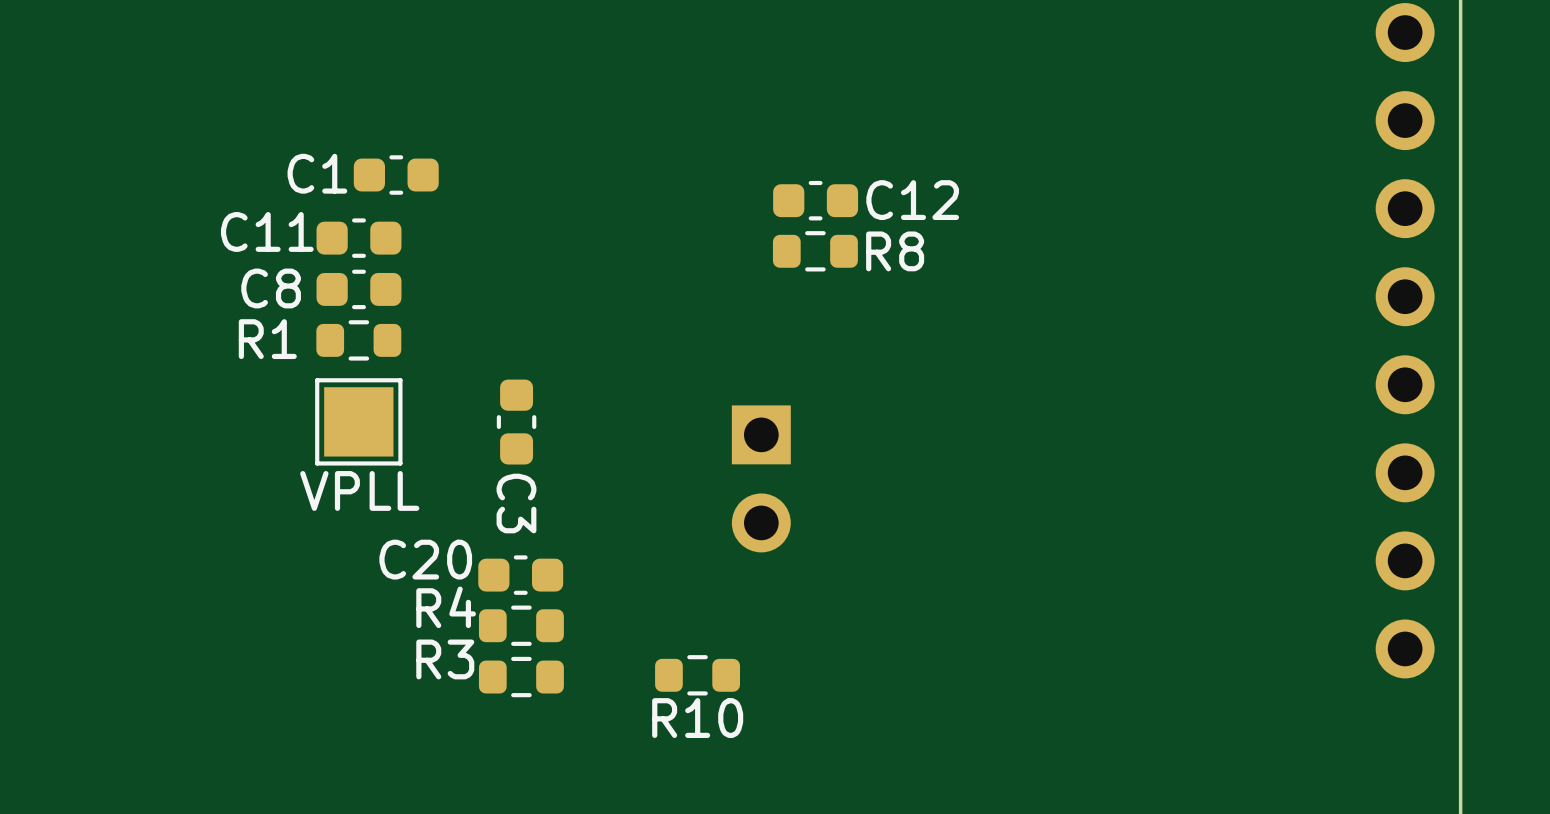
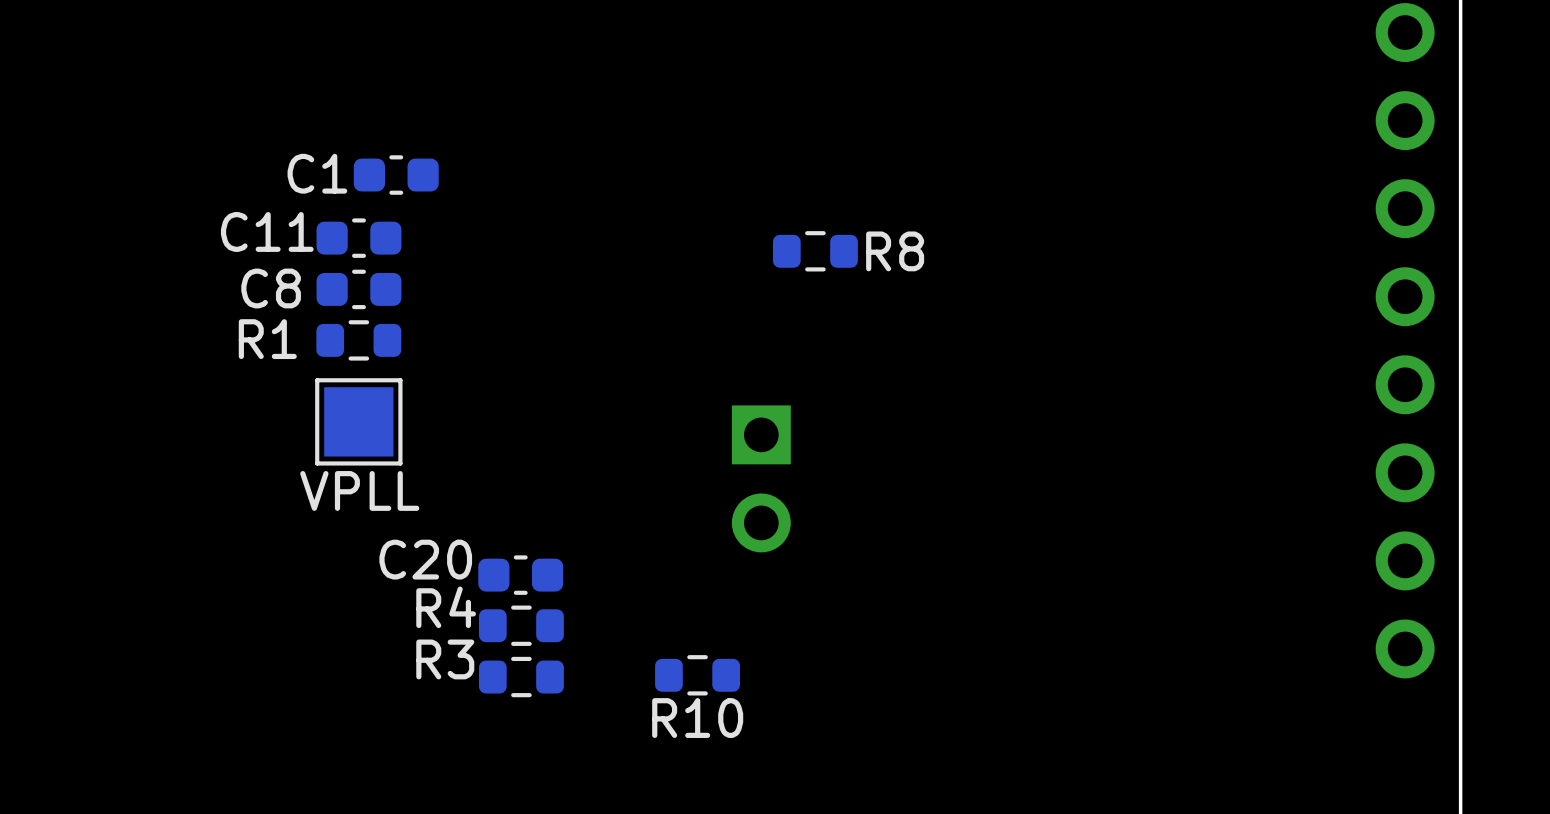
C12: (815, 200) -> none
C3: (516, 422) -> none

